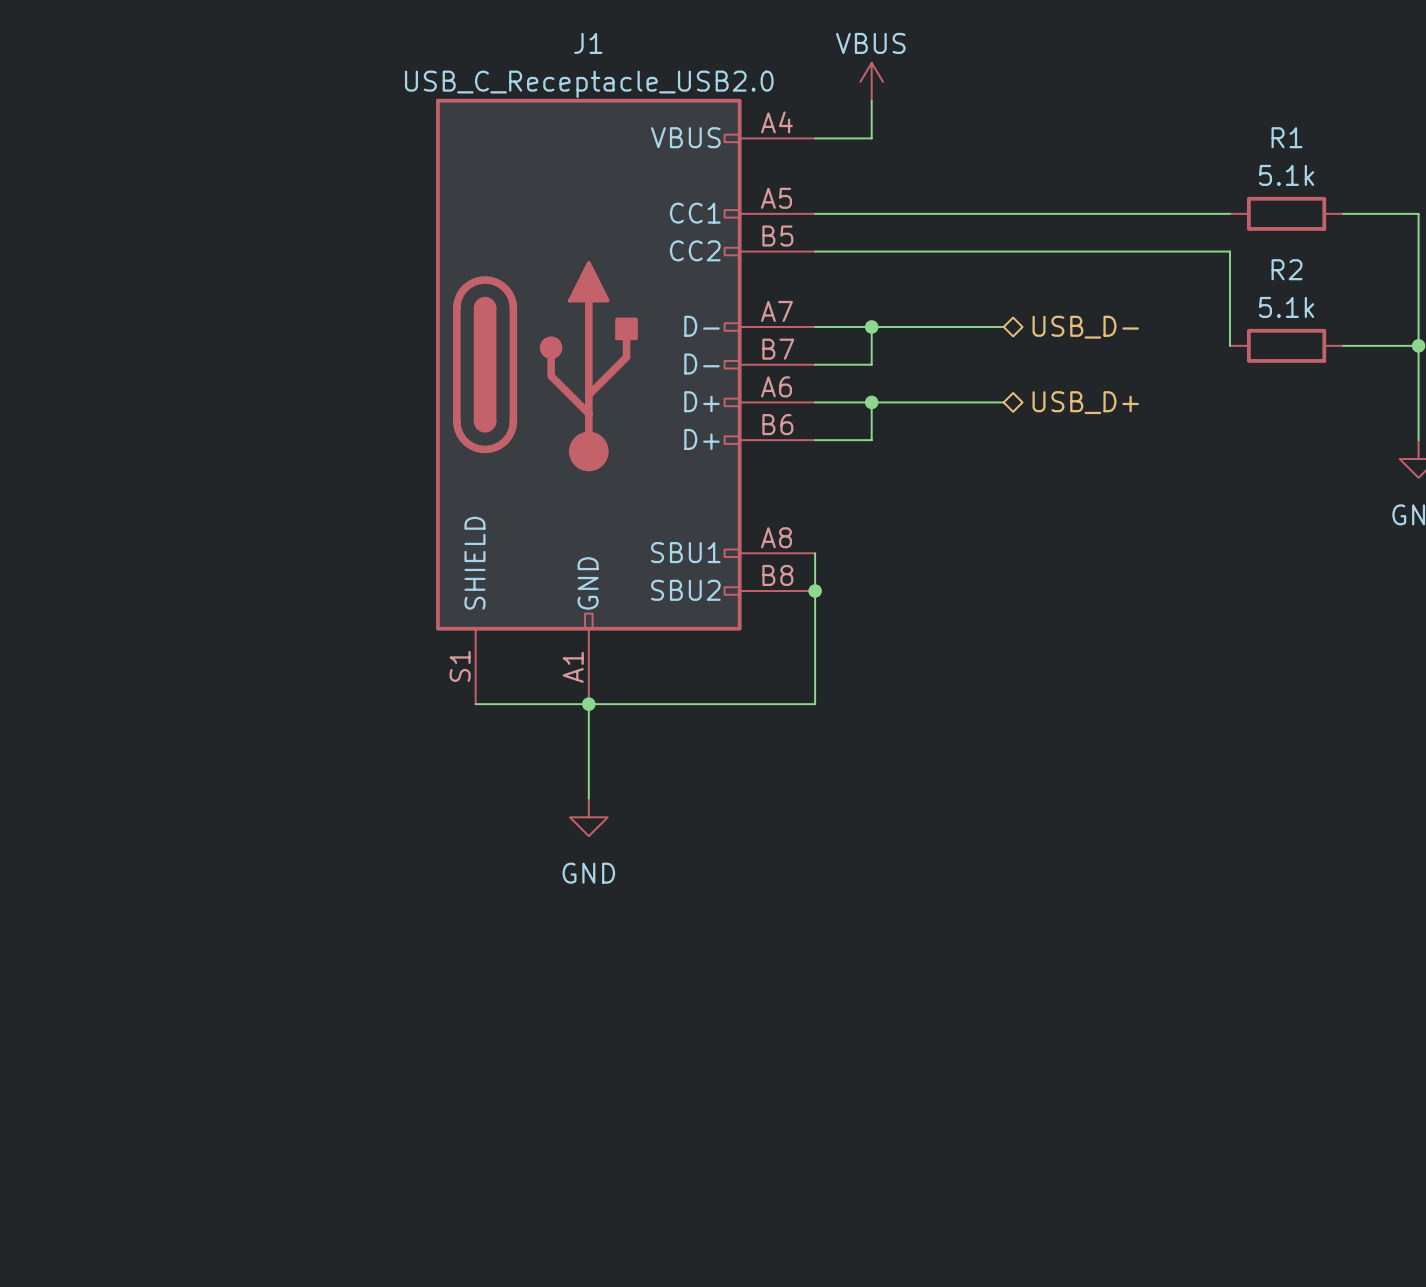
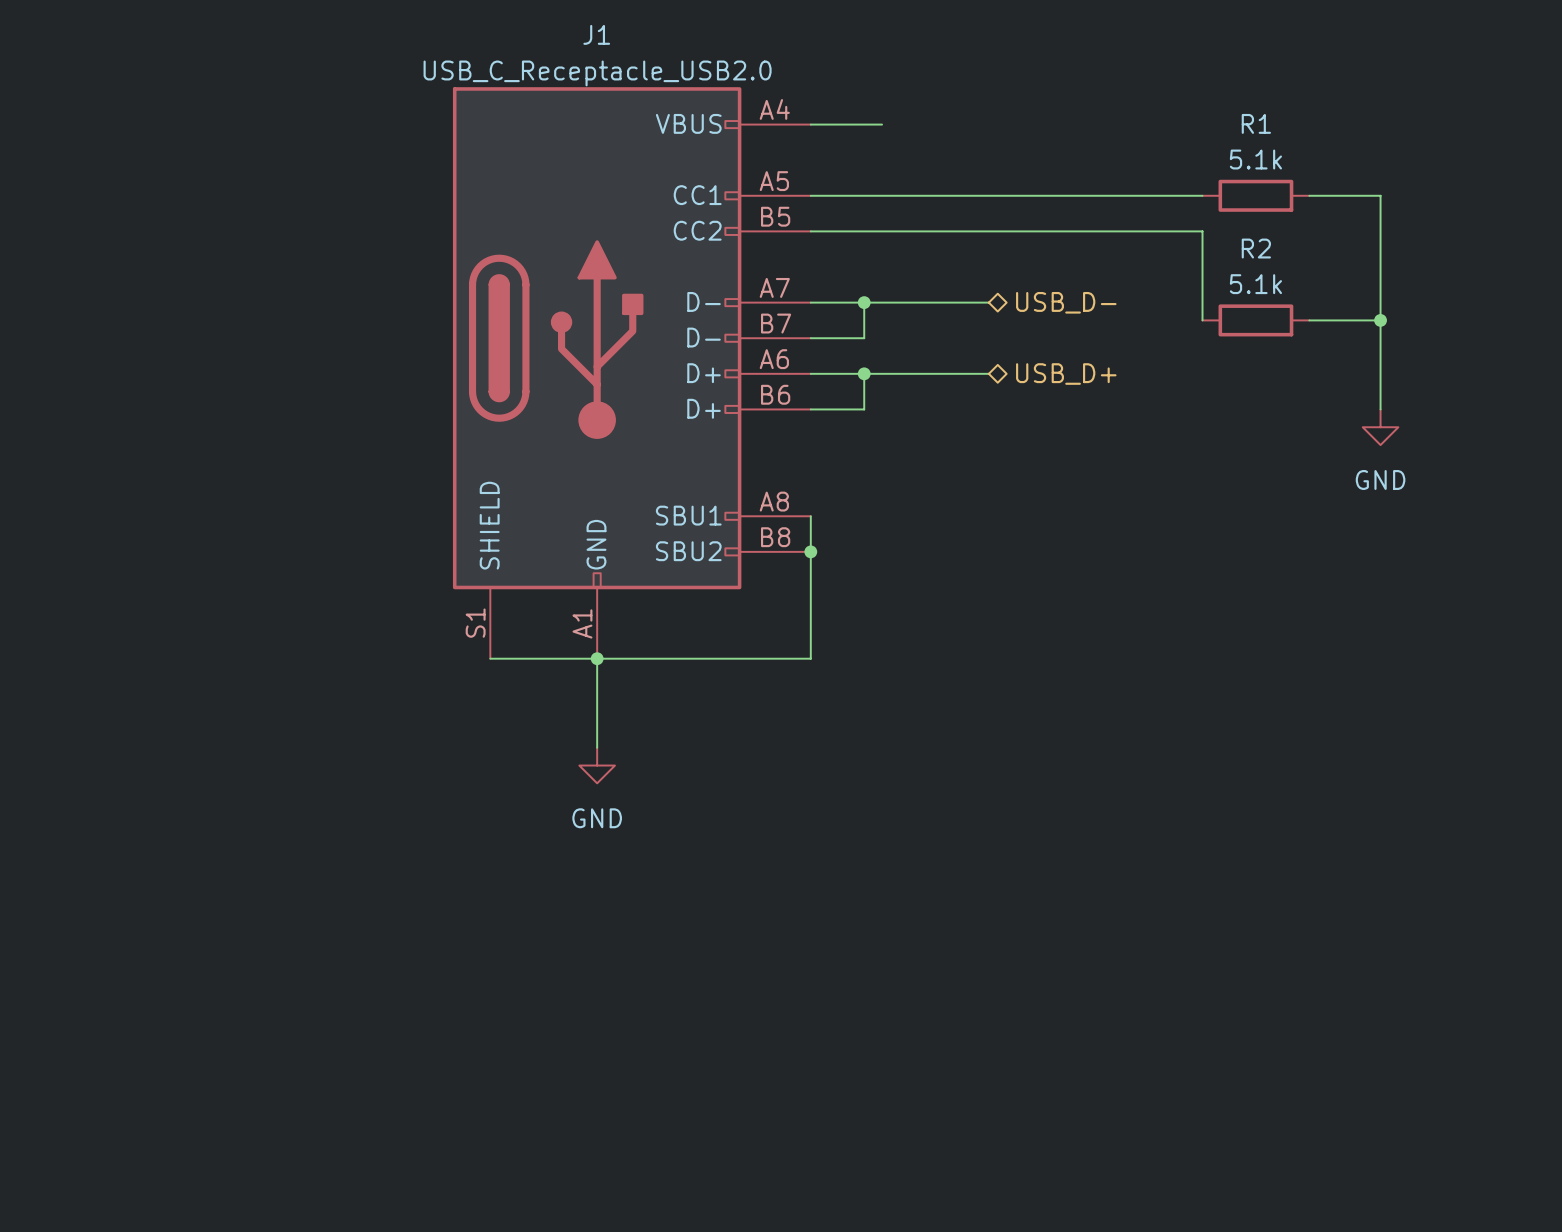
power symbol: VBUS (871, 81) -> none
wire: (871, 100) (871, 138) -> (882, 124) (864, 124)

